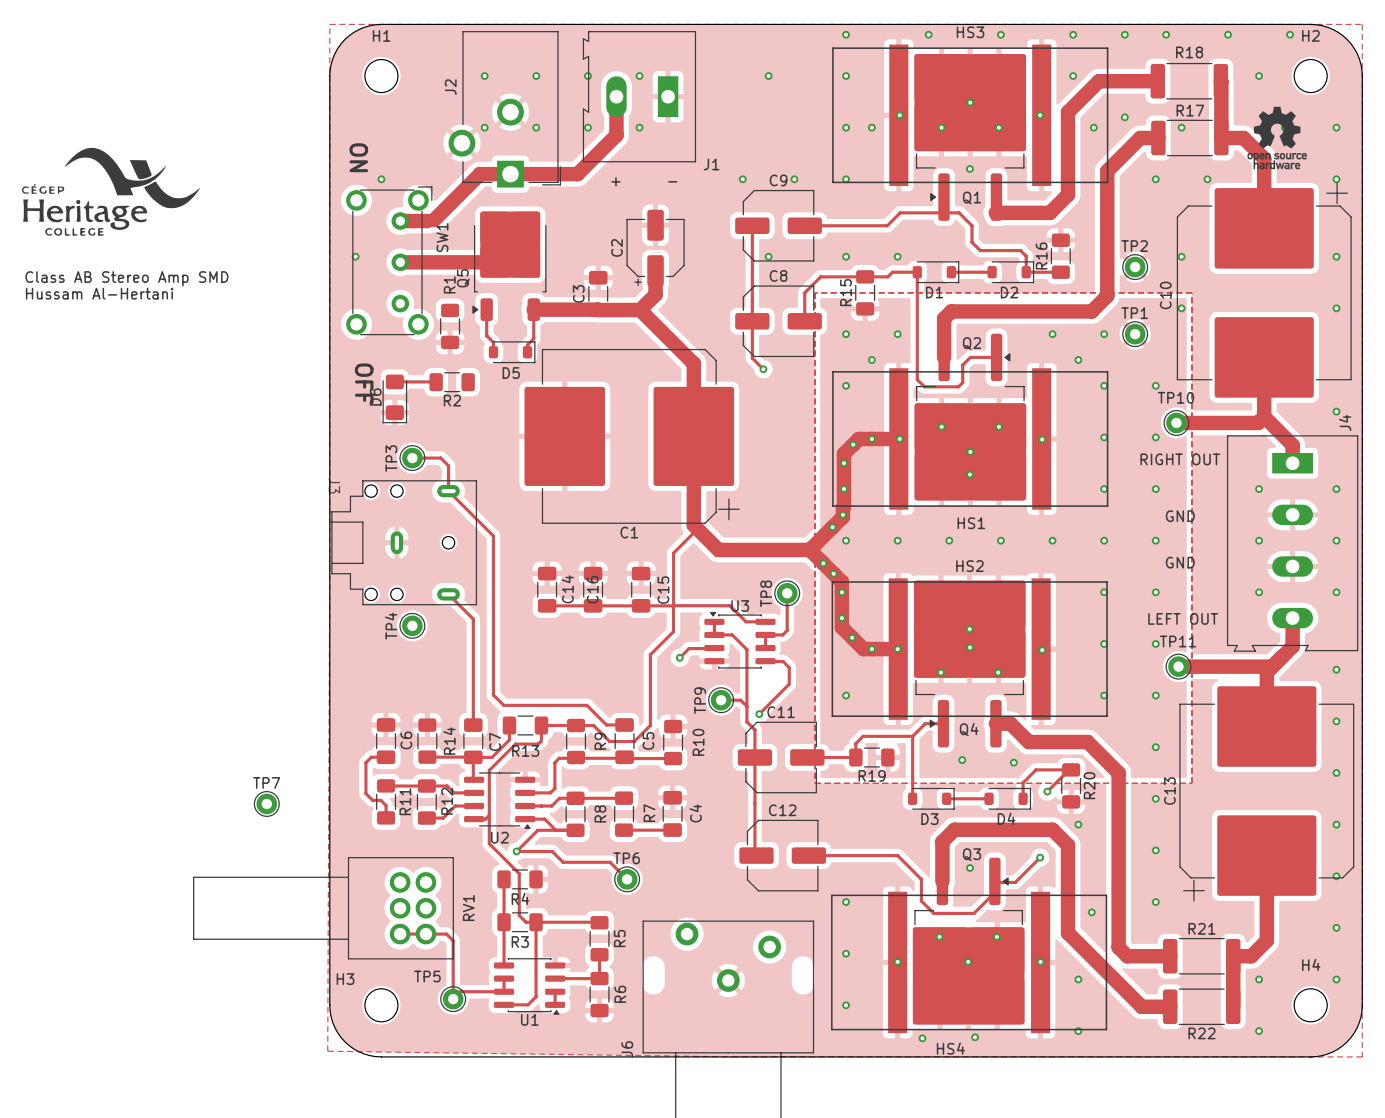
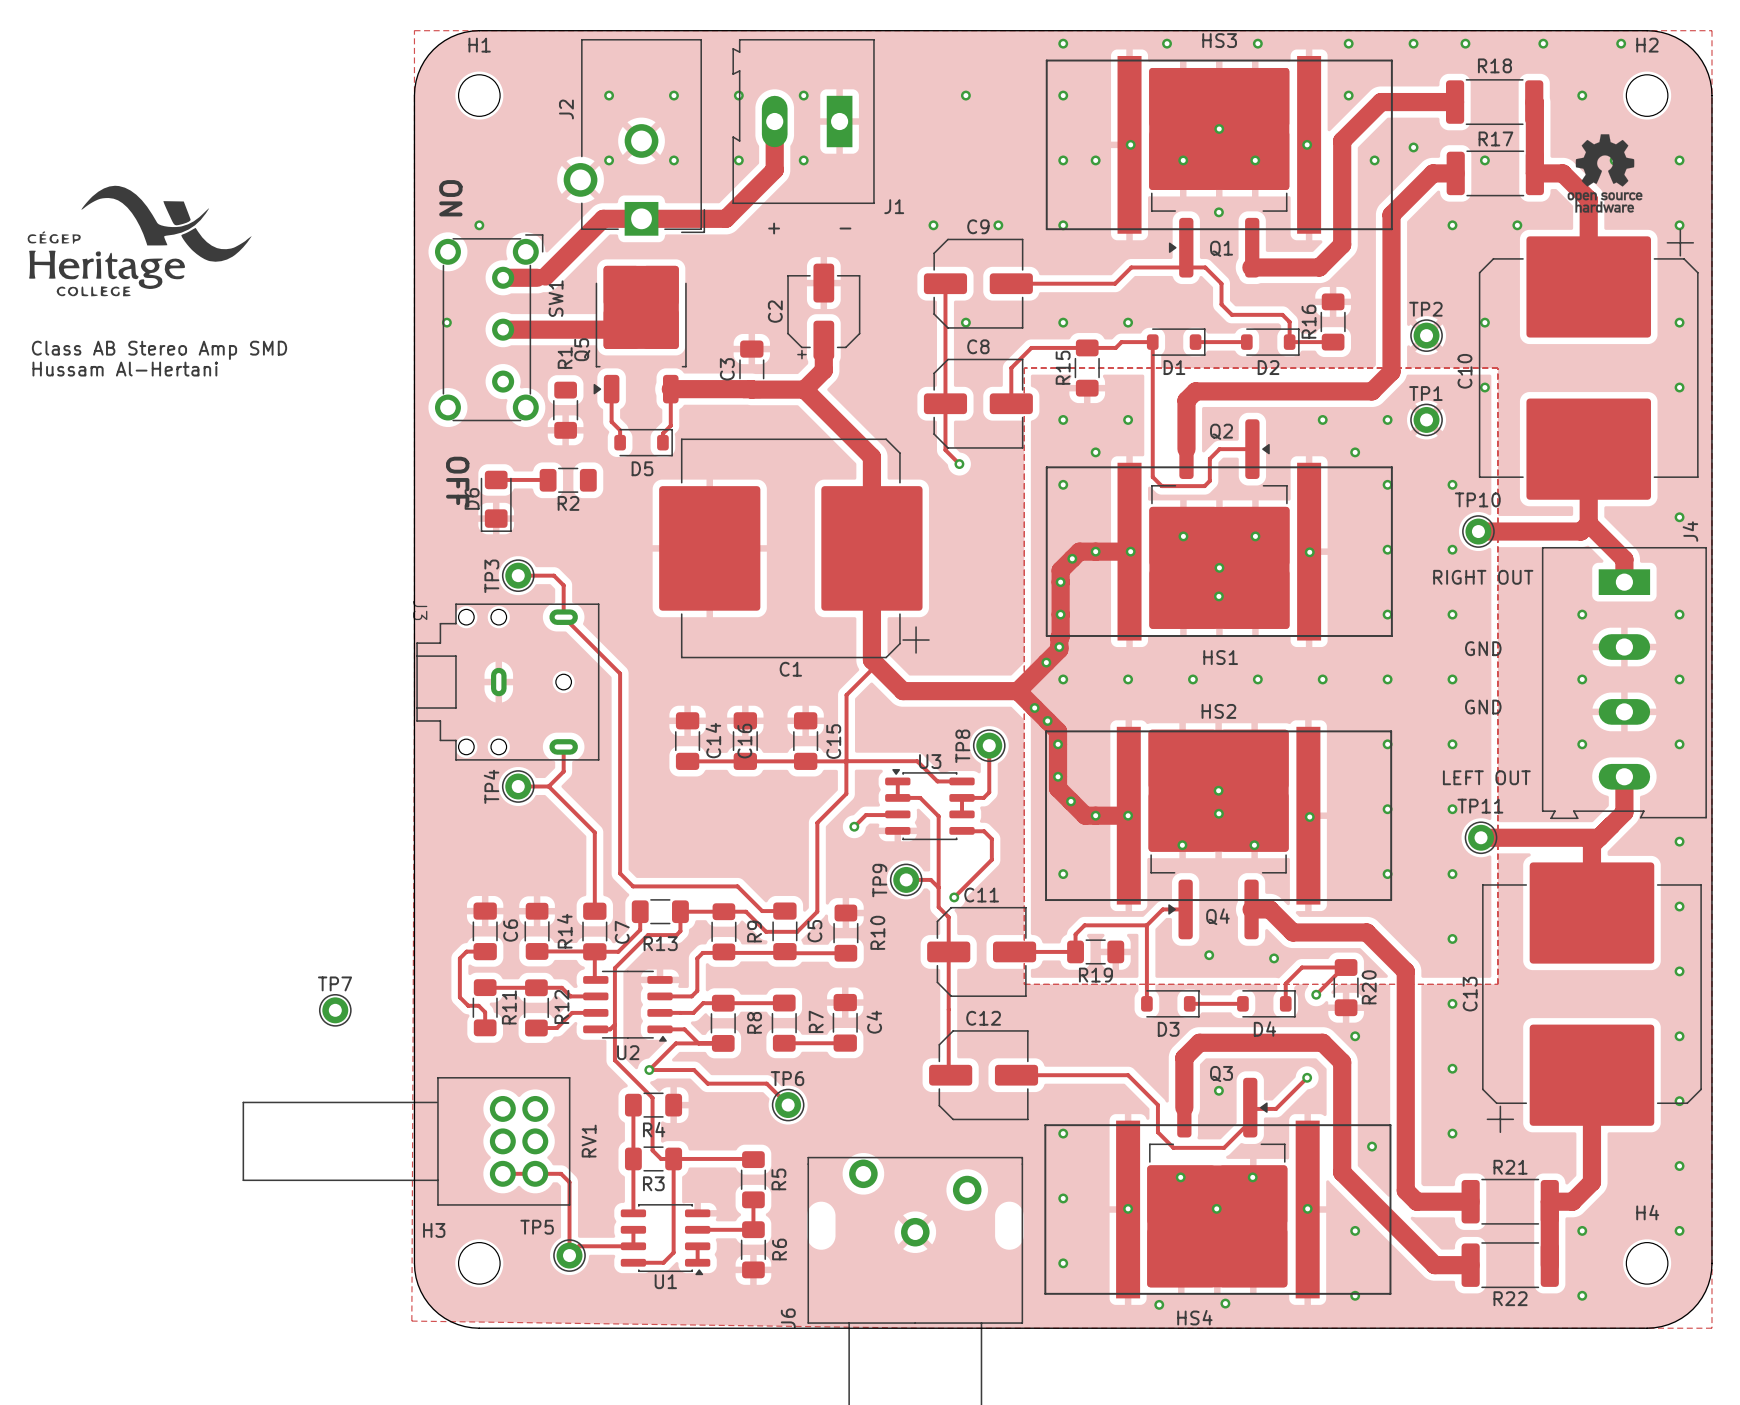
track: (448, 594) (473, 619) (473, 662) -> (548, 786) (594, 832)
track: none -> (563, 746) (563, 771) (548, 786)
track: none -> (518, 786) (548, 786)

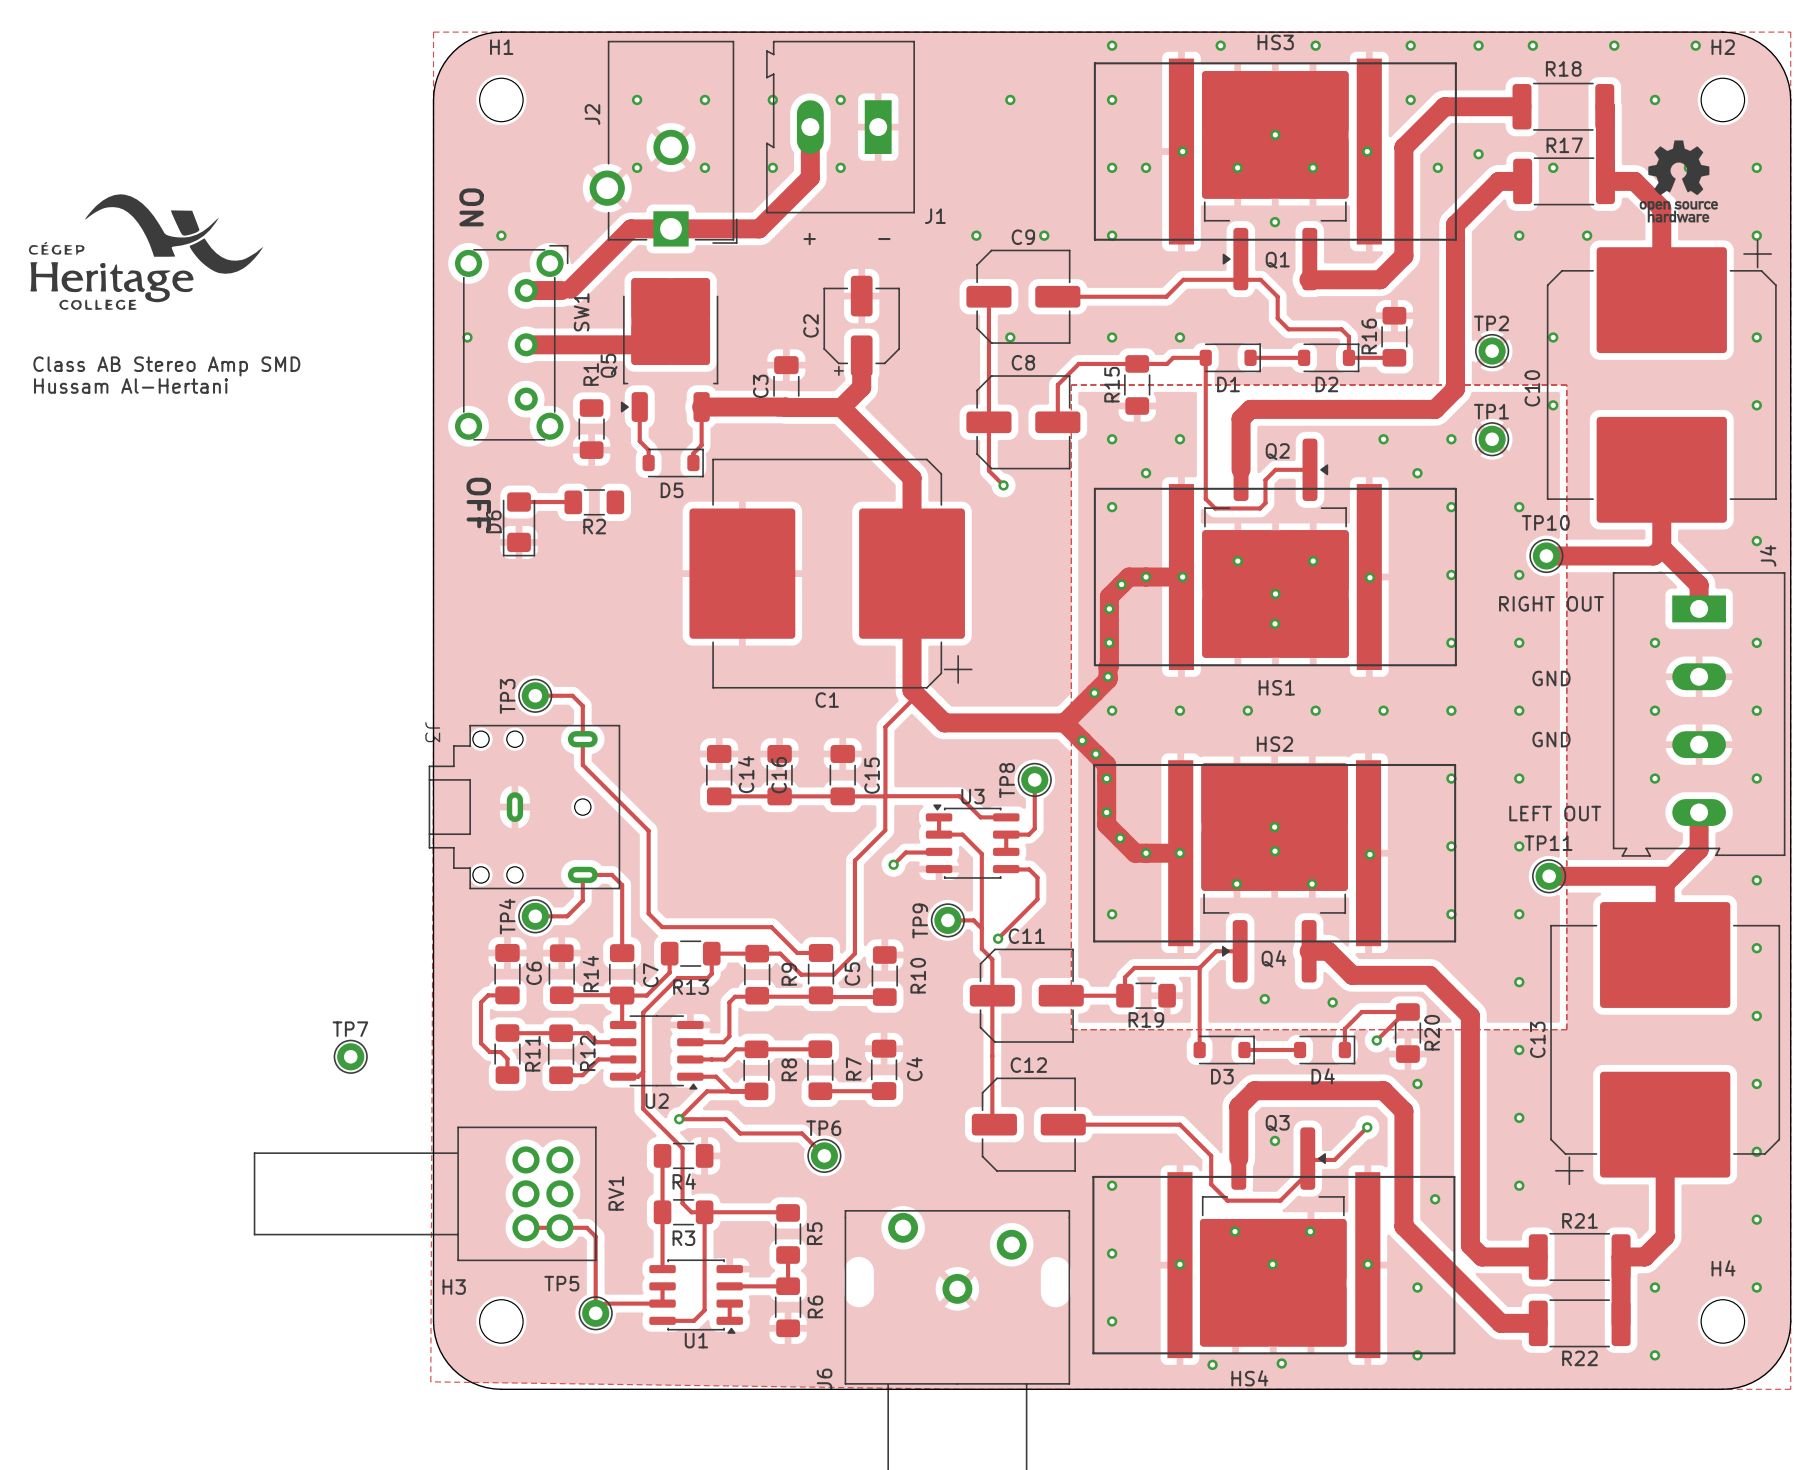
track: (518, 575) (553, 575) (563, 585) (563, 617) -> none
TP3 position: (518, 575) -> (535, 695)
track: (563, 617) (620, 673) (620, 794) -> (535, 695) (572, 695) (582, 705) (582, 764) (648, 830)
J3 position: (507, 682) -> (524, 807)
track: (563, 746) (563, 771) (548, 786) -> none
track: (518, 786) (548, 786) -> none
TP4 position: (518, 786) -> (535, 916)
track: (548, 786) (594, 832) (594, 846) -> (535, 916) (567, 916) (582, 900) (582, 874) (611, 874) (622, 885)

